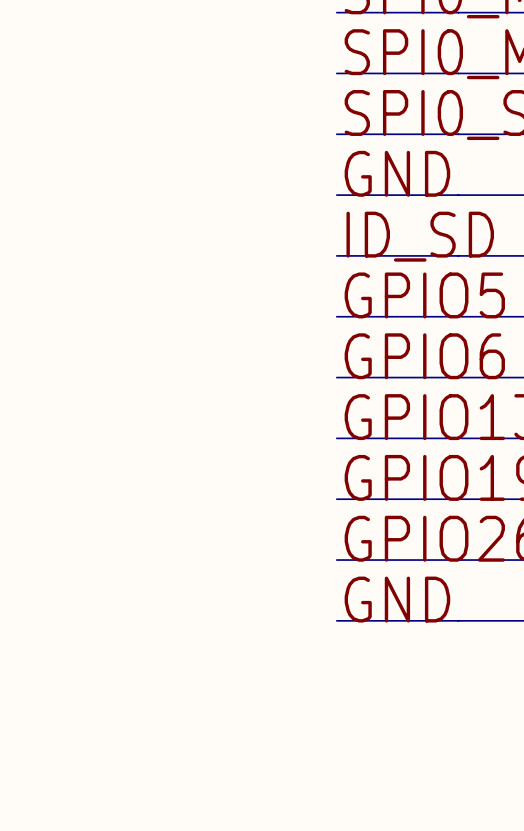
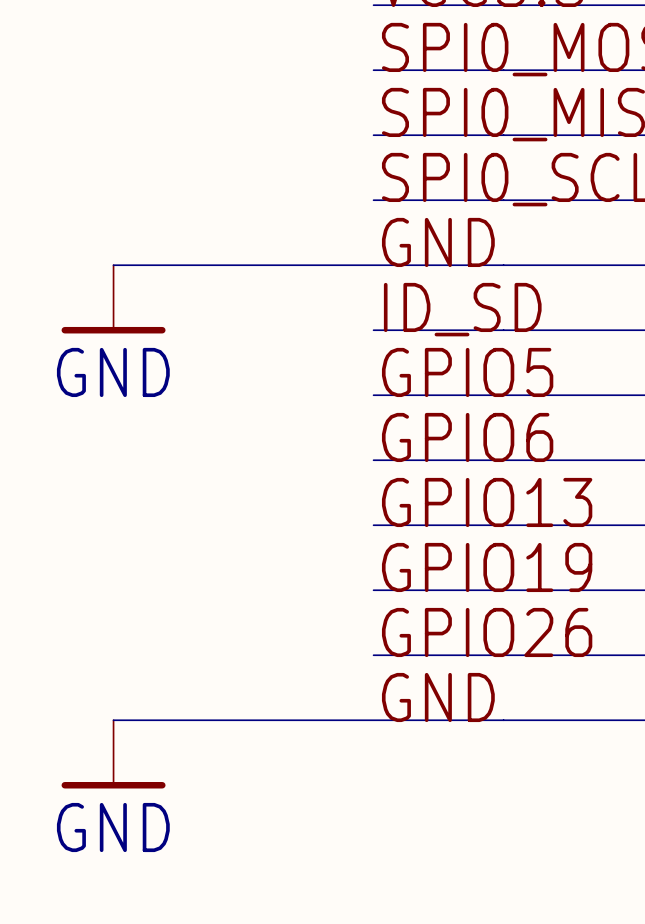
wire: none -> (113, 265) (373, 265)
power symbol: none -> GND (113, 299)
wire: none -> (113, 720) (373, 720)
power symbol: none -> GND (113, 754)

